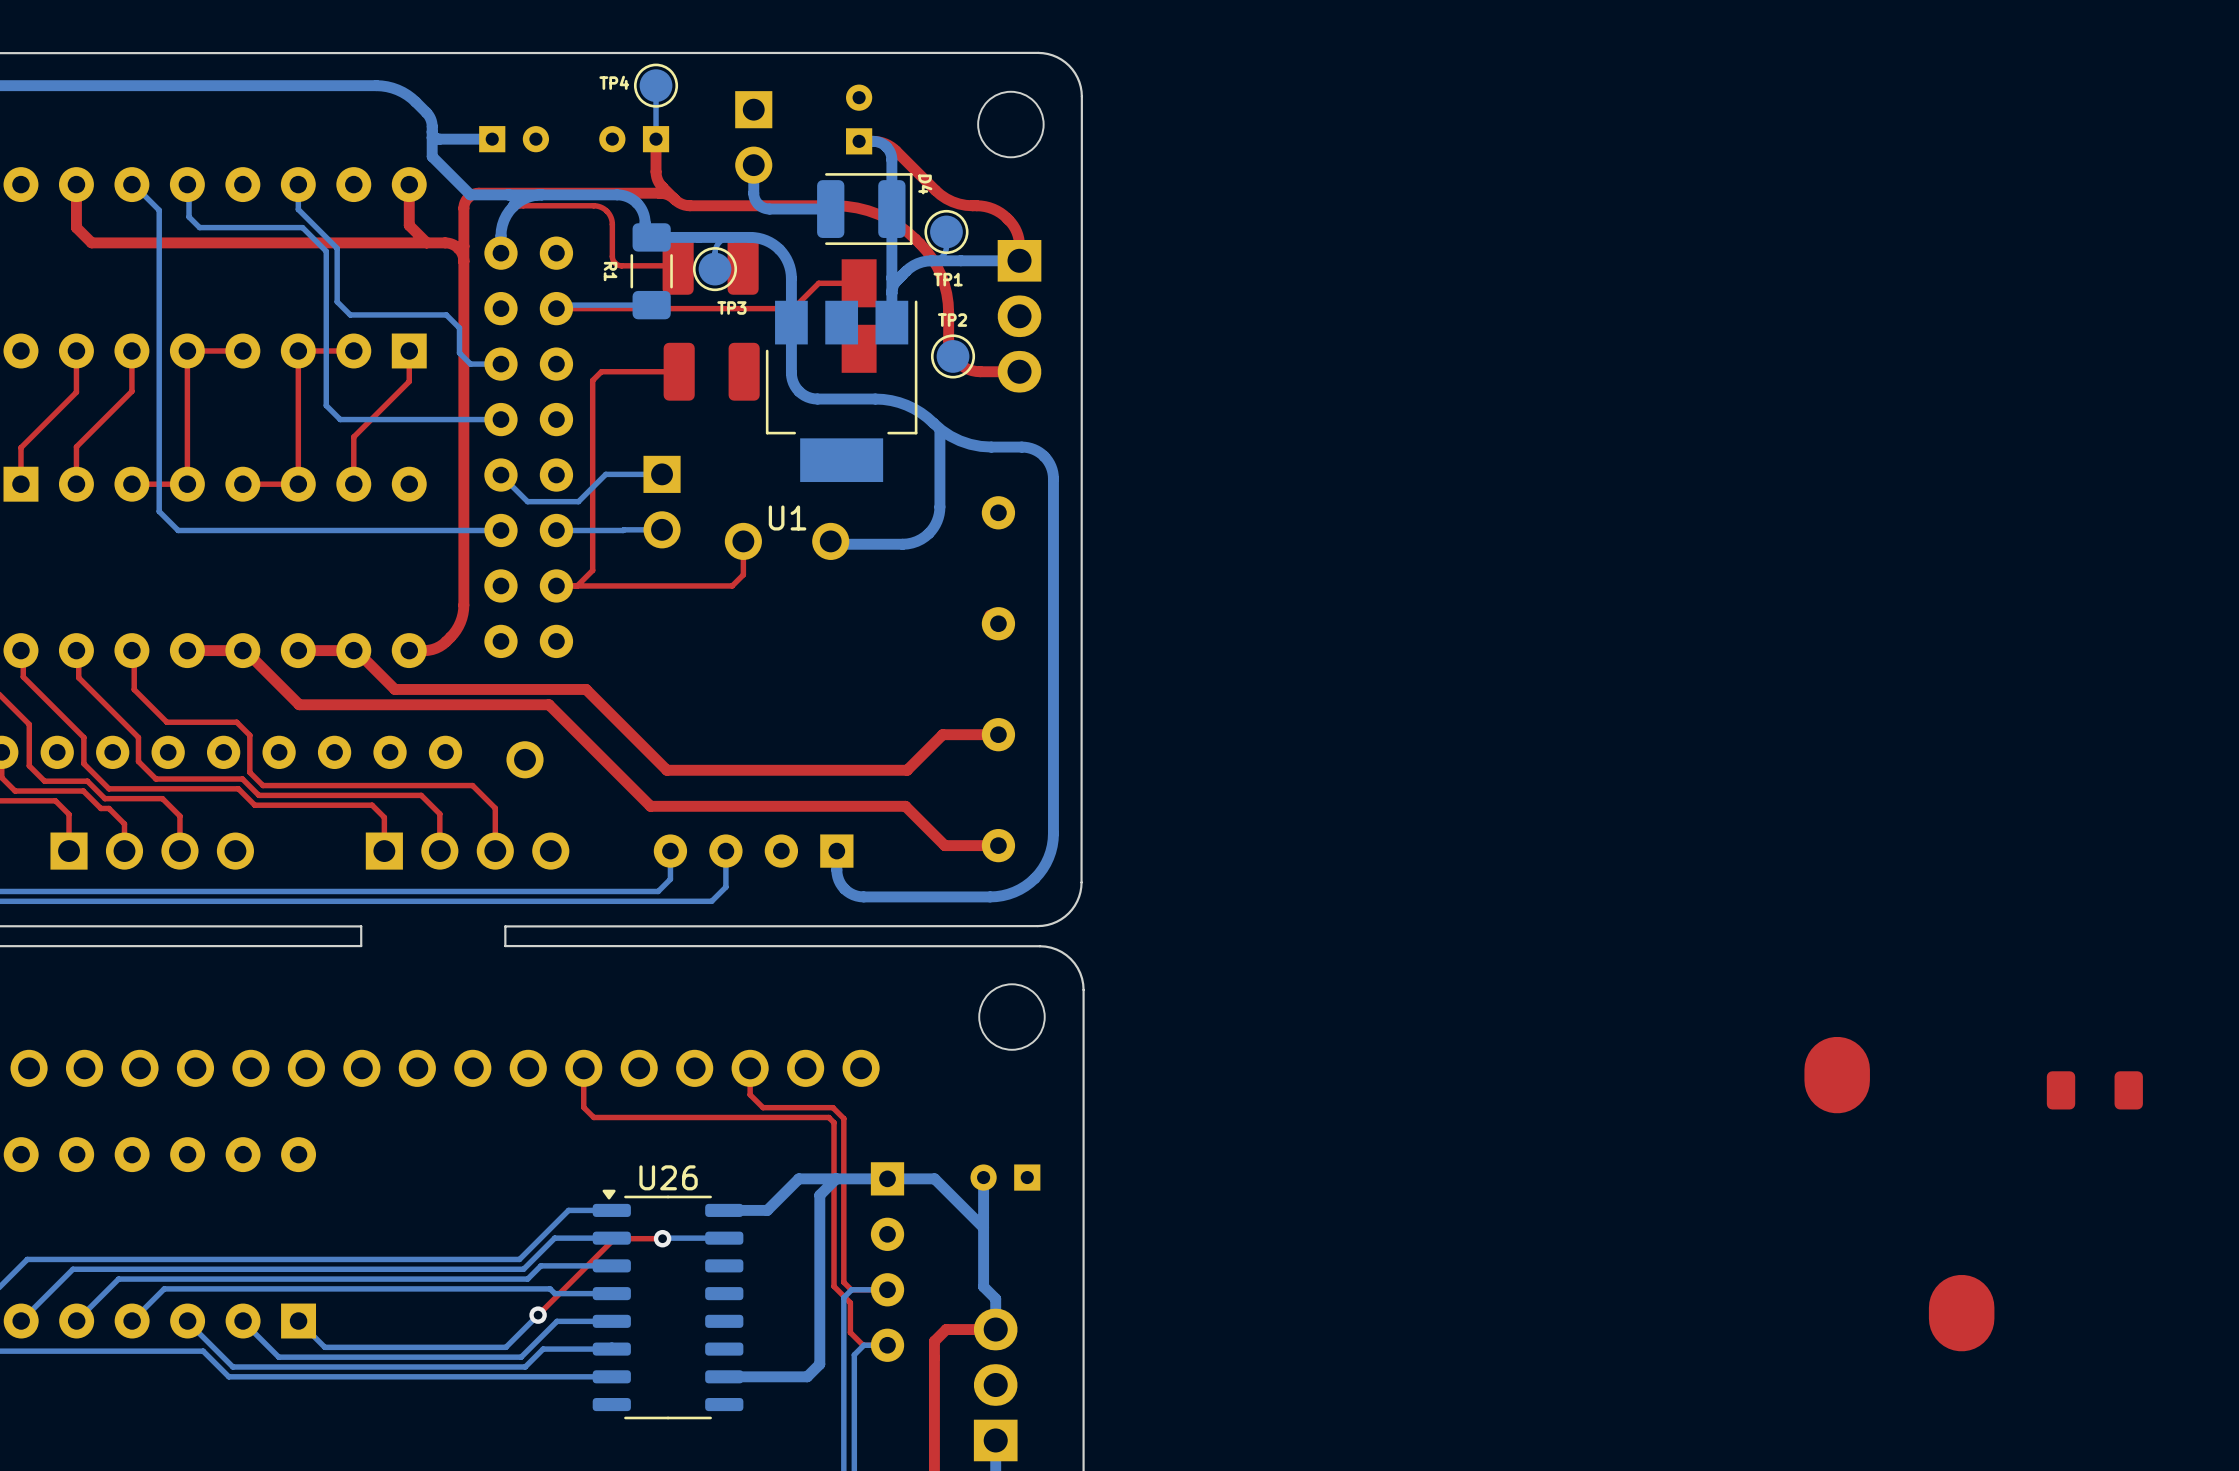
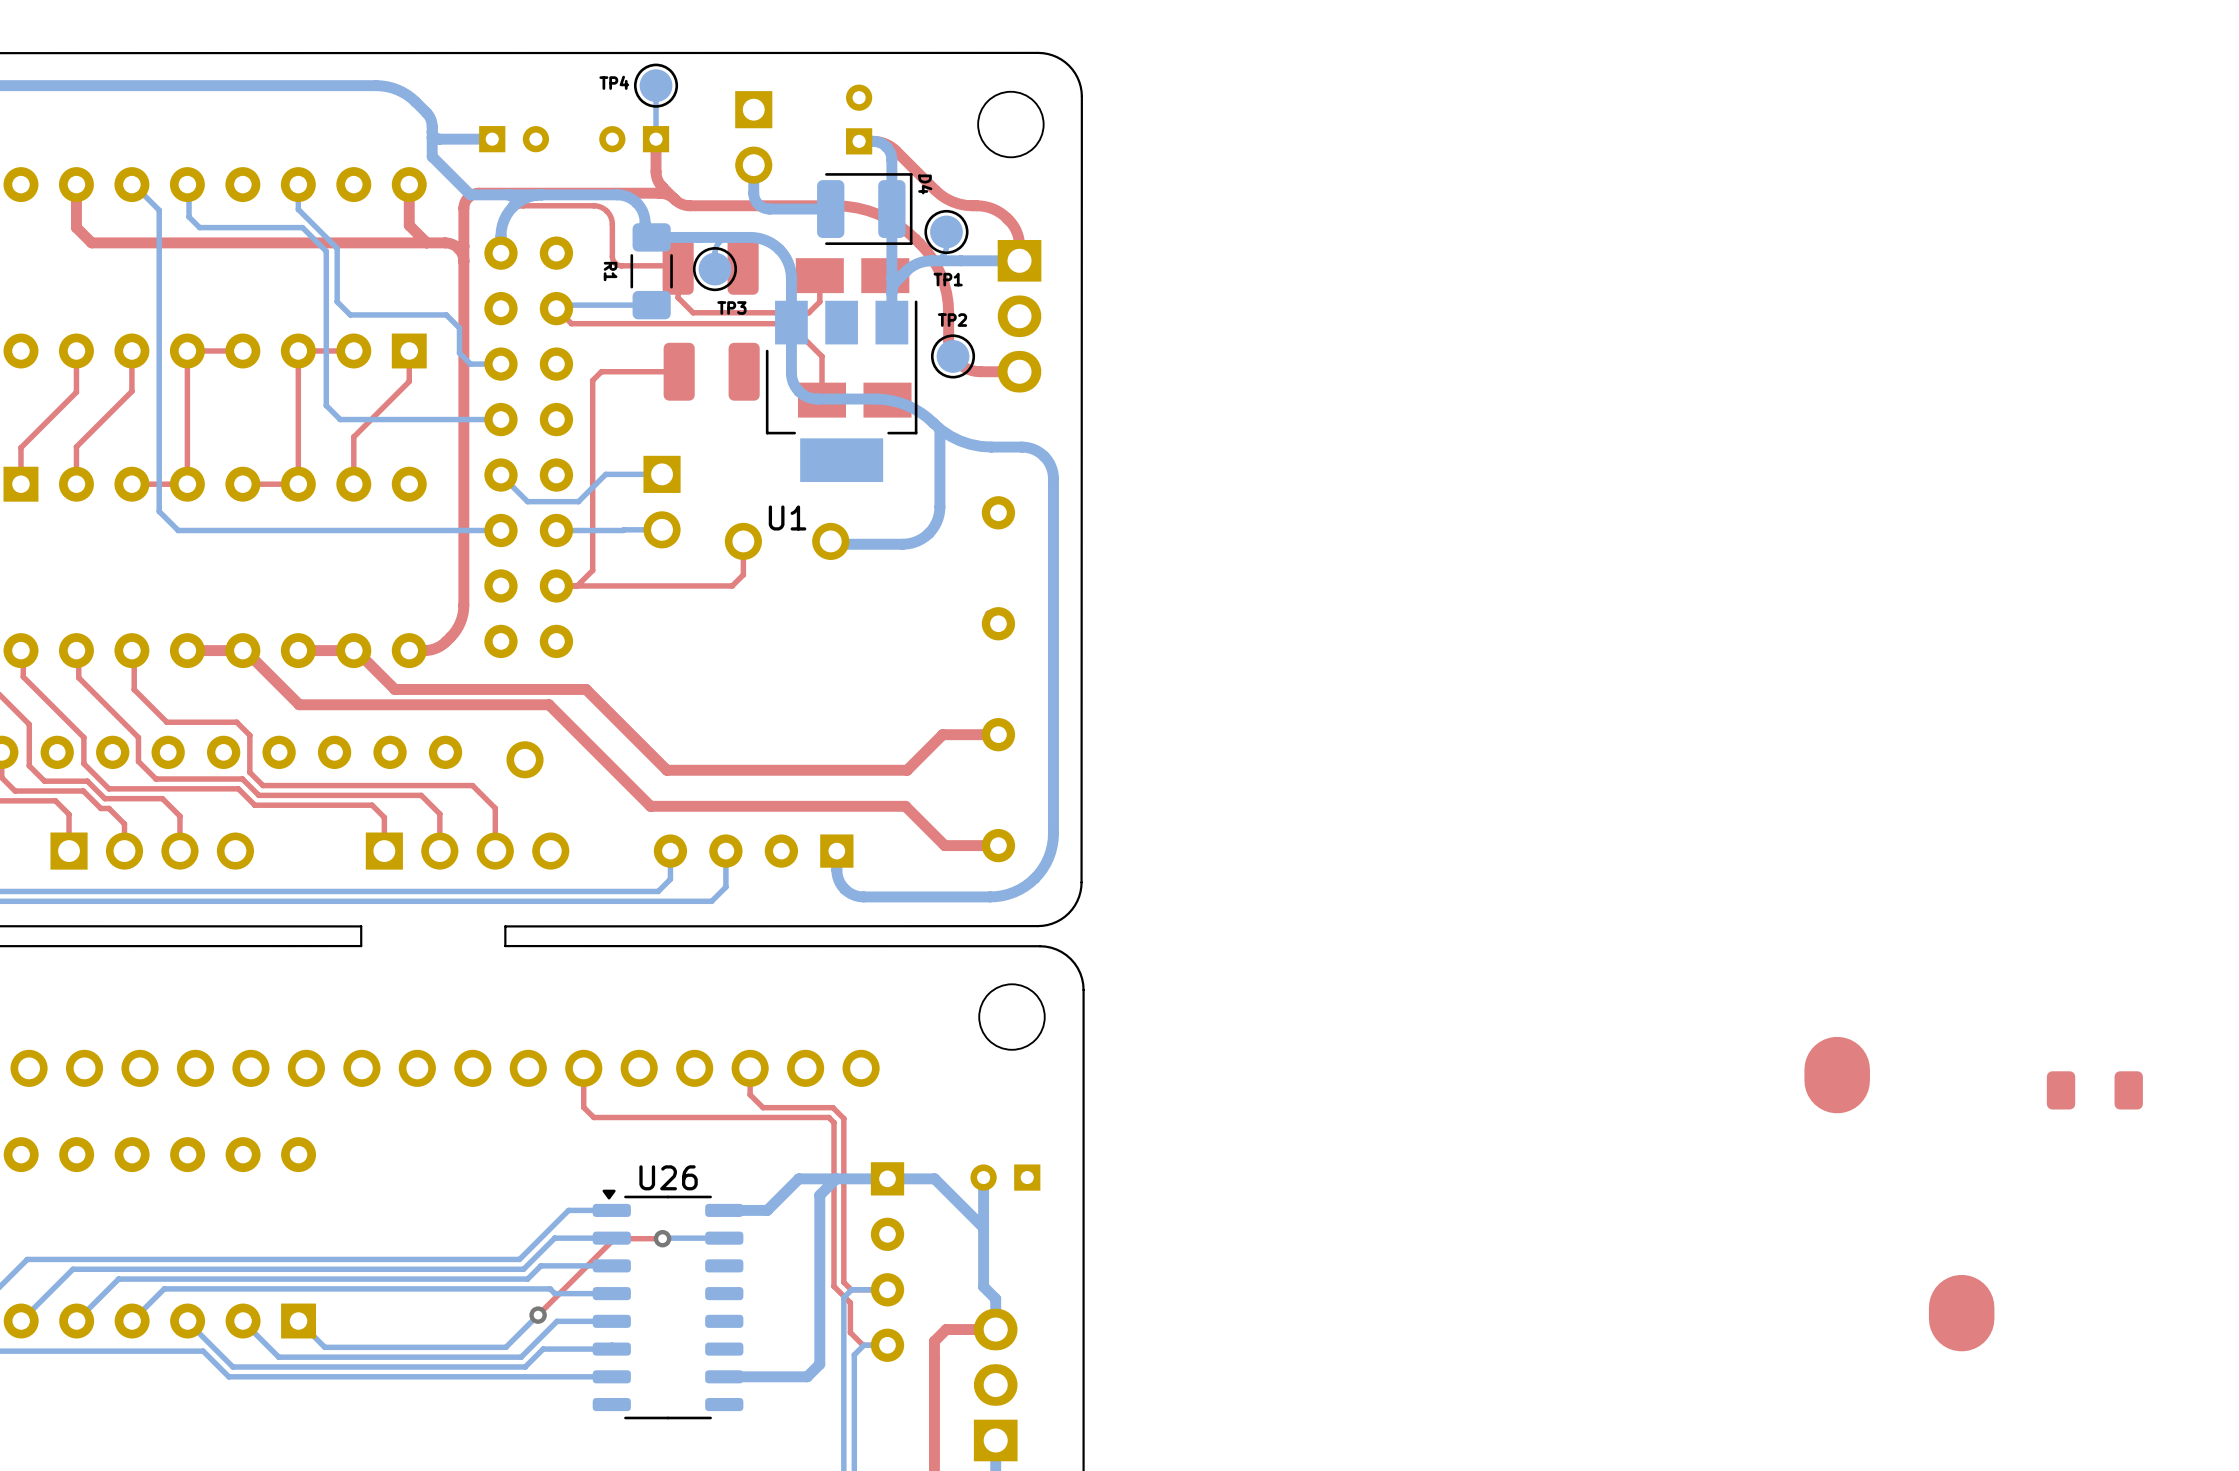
top track: none -> (678, 265) (678, 297) (693, 312) (808, 312) (819, 301) (819, 275)
top track: (859, 283) (818, 283) (793, 308) (556, 308) -> none
top track: none -> (563, 316) (571, 323) (789, 323) (821, 356) (821, 400)
part rotation: 0° (859, 316) -> 90° clockwise (852, 275)
part: none -> (854, 400)

